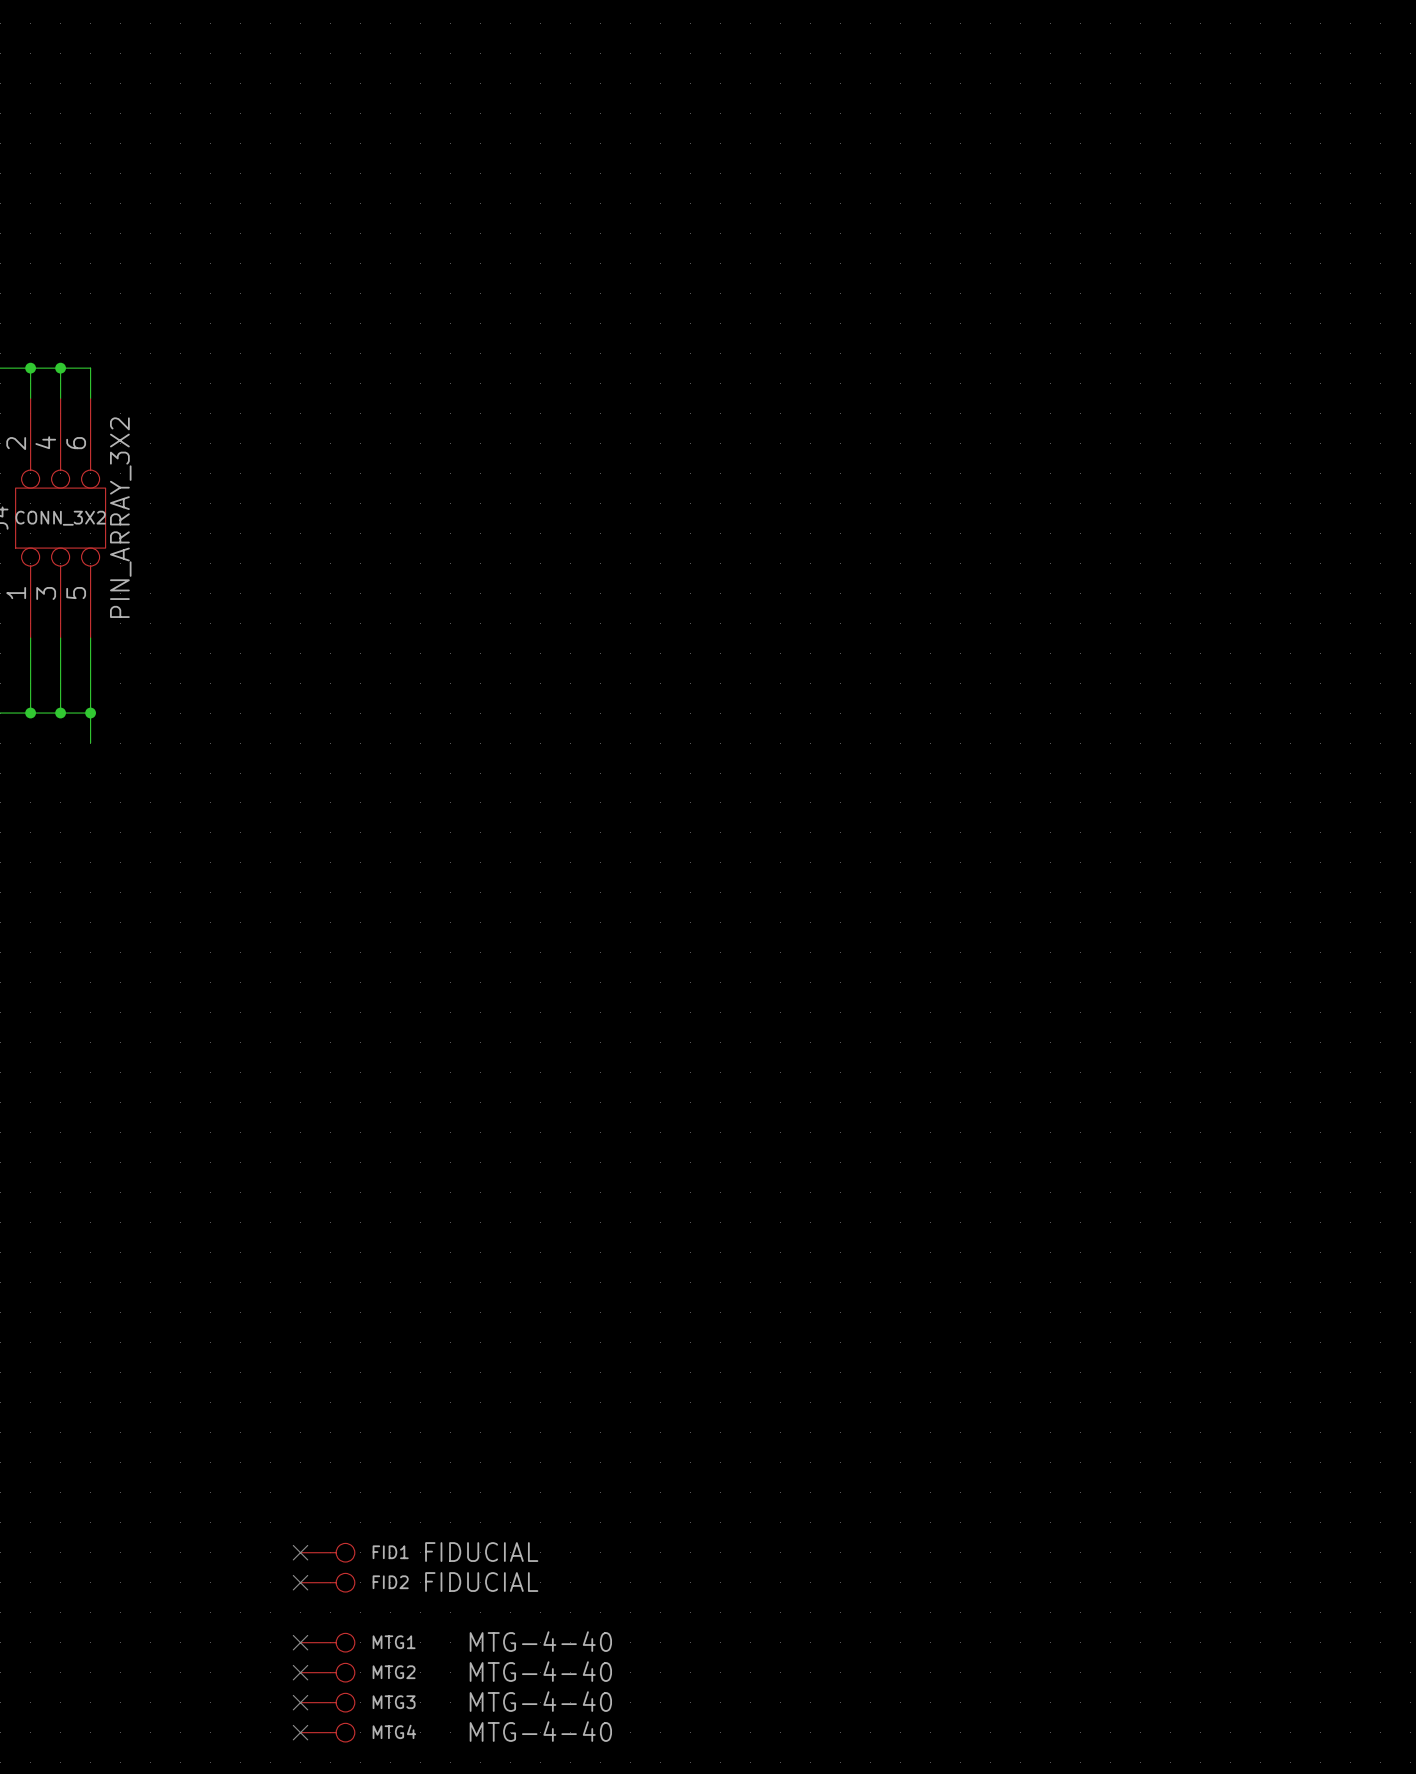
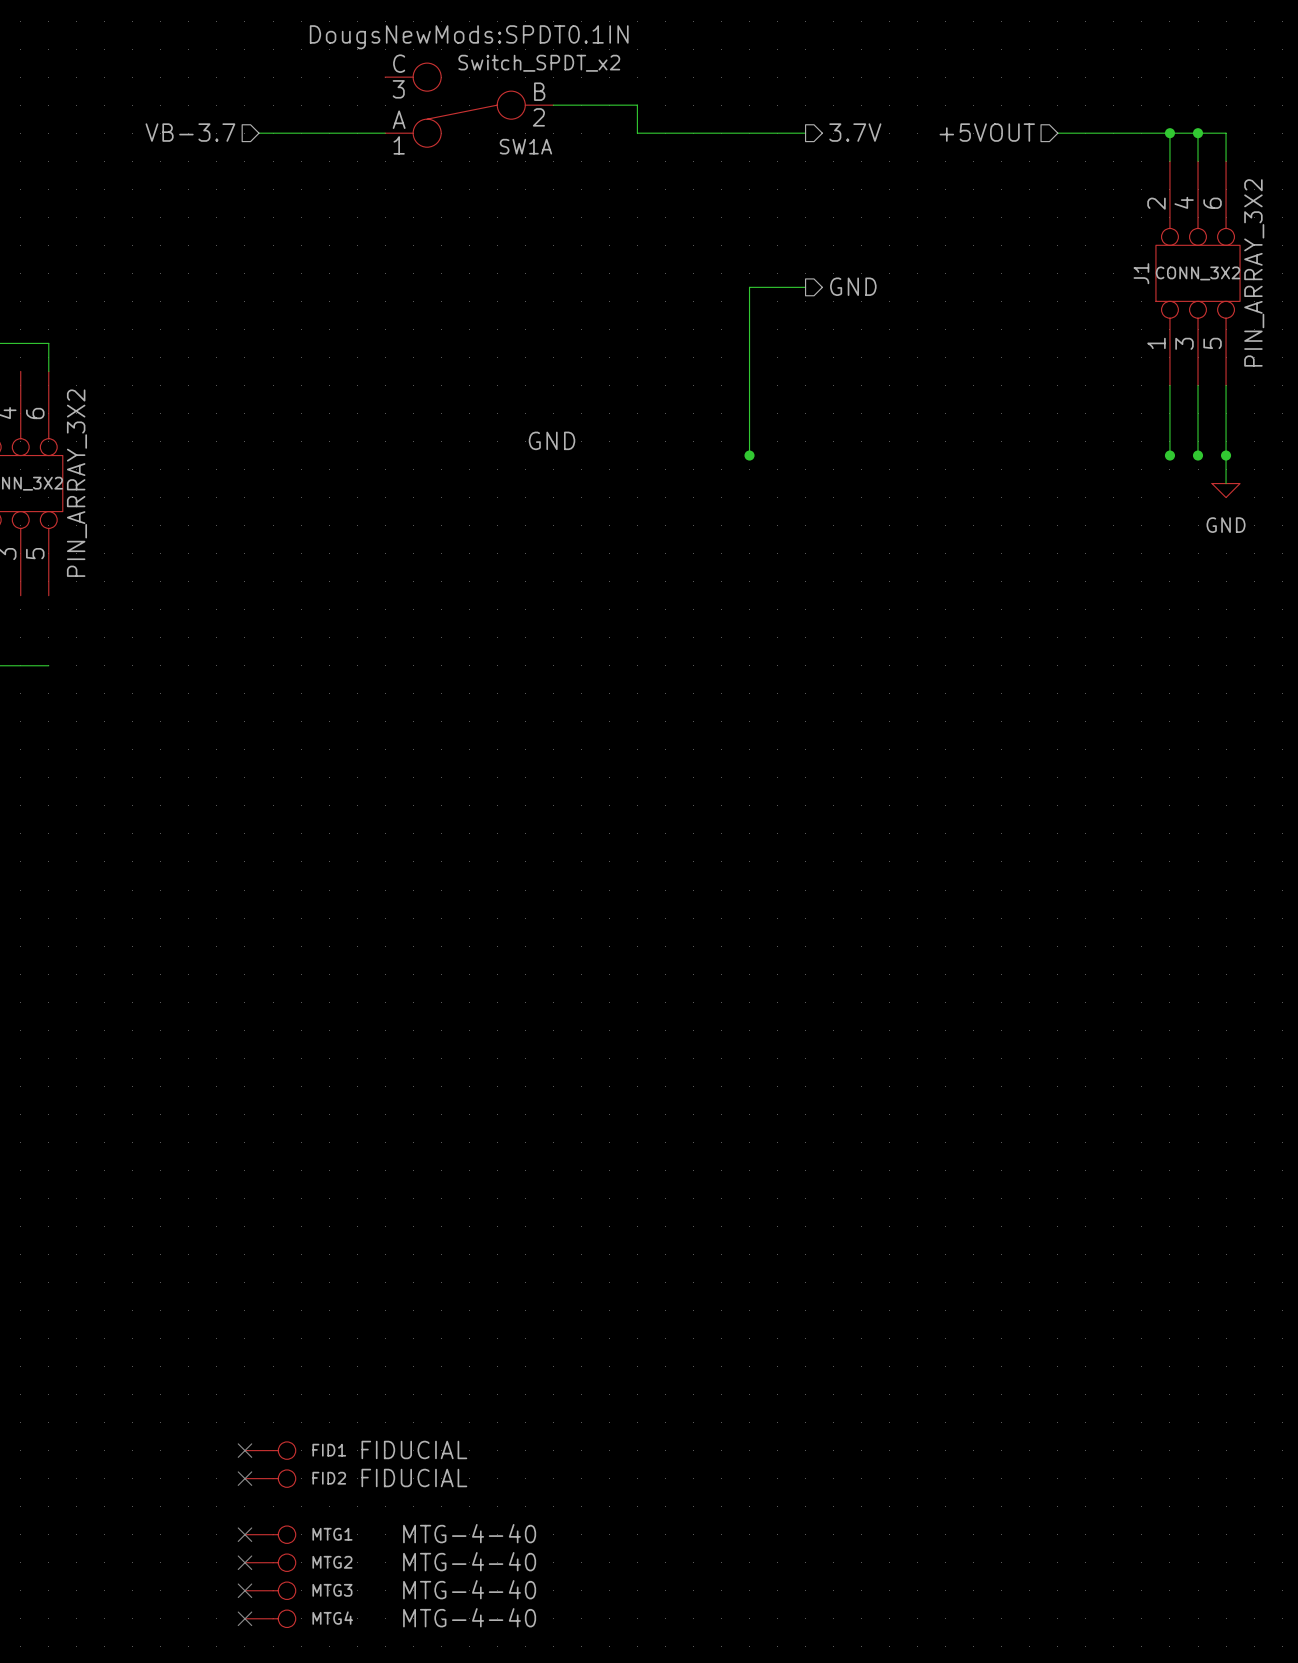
SW1A: none -> Switch_SPDT_x2 (469, 105)
wire: none -> (553, 105) (637, 105) (637, 133) (805, 133)
sheet pin: none -> VB-3.7 (190, 132)
sheet pin: none -> 3.7V (855, 132)
sheet pin: none -> +5VOUT (987, 132)
wire: none -> (258, 133) (385, 133)
wire: none -> (1057, 133) (1226, 133) (1226, 161)
wire: none -> (1169, 133) (1169, 161)
junction: none -> (1169, 133)
wire: none -> (1198, 133) (1198, 161)
junction: none -> (1198, 133)
J1: none -> CONN_3X2 (1198, 273)
sheet pin: none -> GND (853, 286)
wire: none -> (805, 287) (749, 287) (749, 455)
wire: (60, 368) (60, 398) -> none
junction: (60, 368) -> none
wire: none -> (1169, 385) (1169, 455)
wire: none -> (1198, 385) (1198, 455)
wire: none -> (1226, 385) (1226, 483)
label: none -> GND (552, 440)
junction: none -> (749, 455)
junction: none -> (1169, 455)
junction: none -> (1198, 455)
junction: none -> (1226, 455)
power symbol: none -> GND (1226, 490)
wire: (60, 638) (60, 713) -> none
wire: (90, 638) (90, 743) -> none
junction: (60, 713) -> none
junction: (90, 713) -> none

